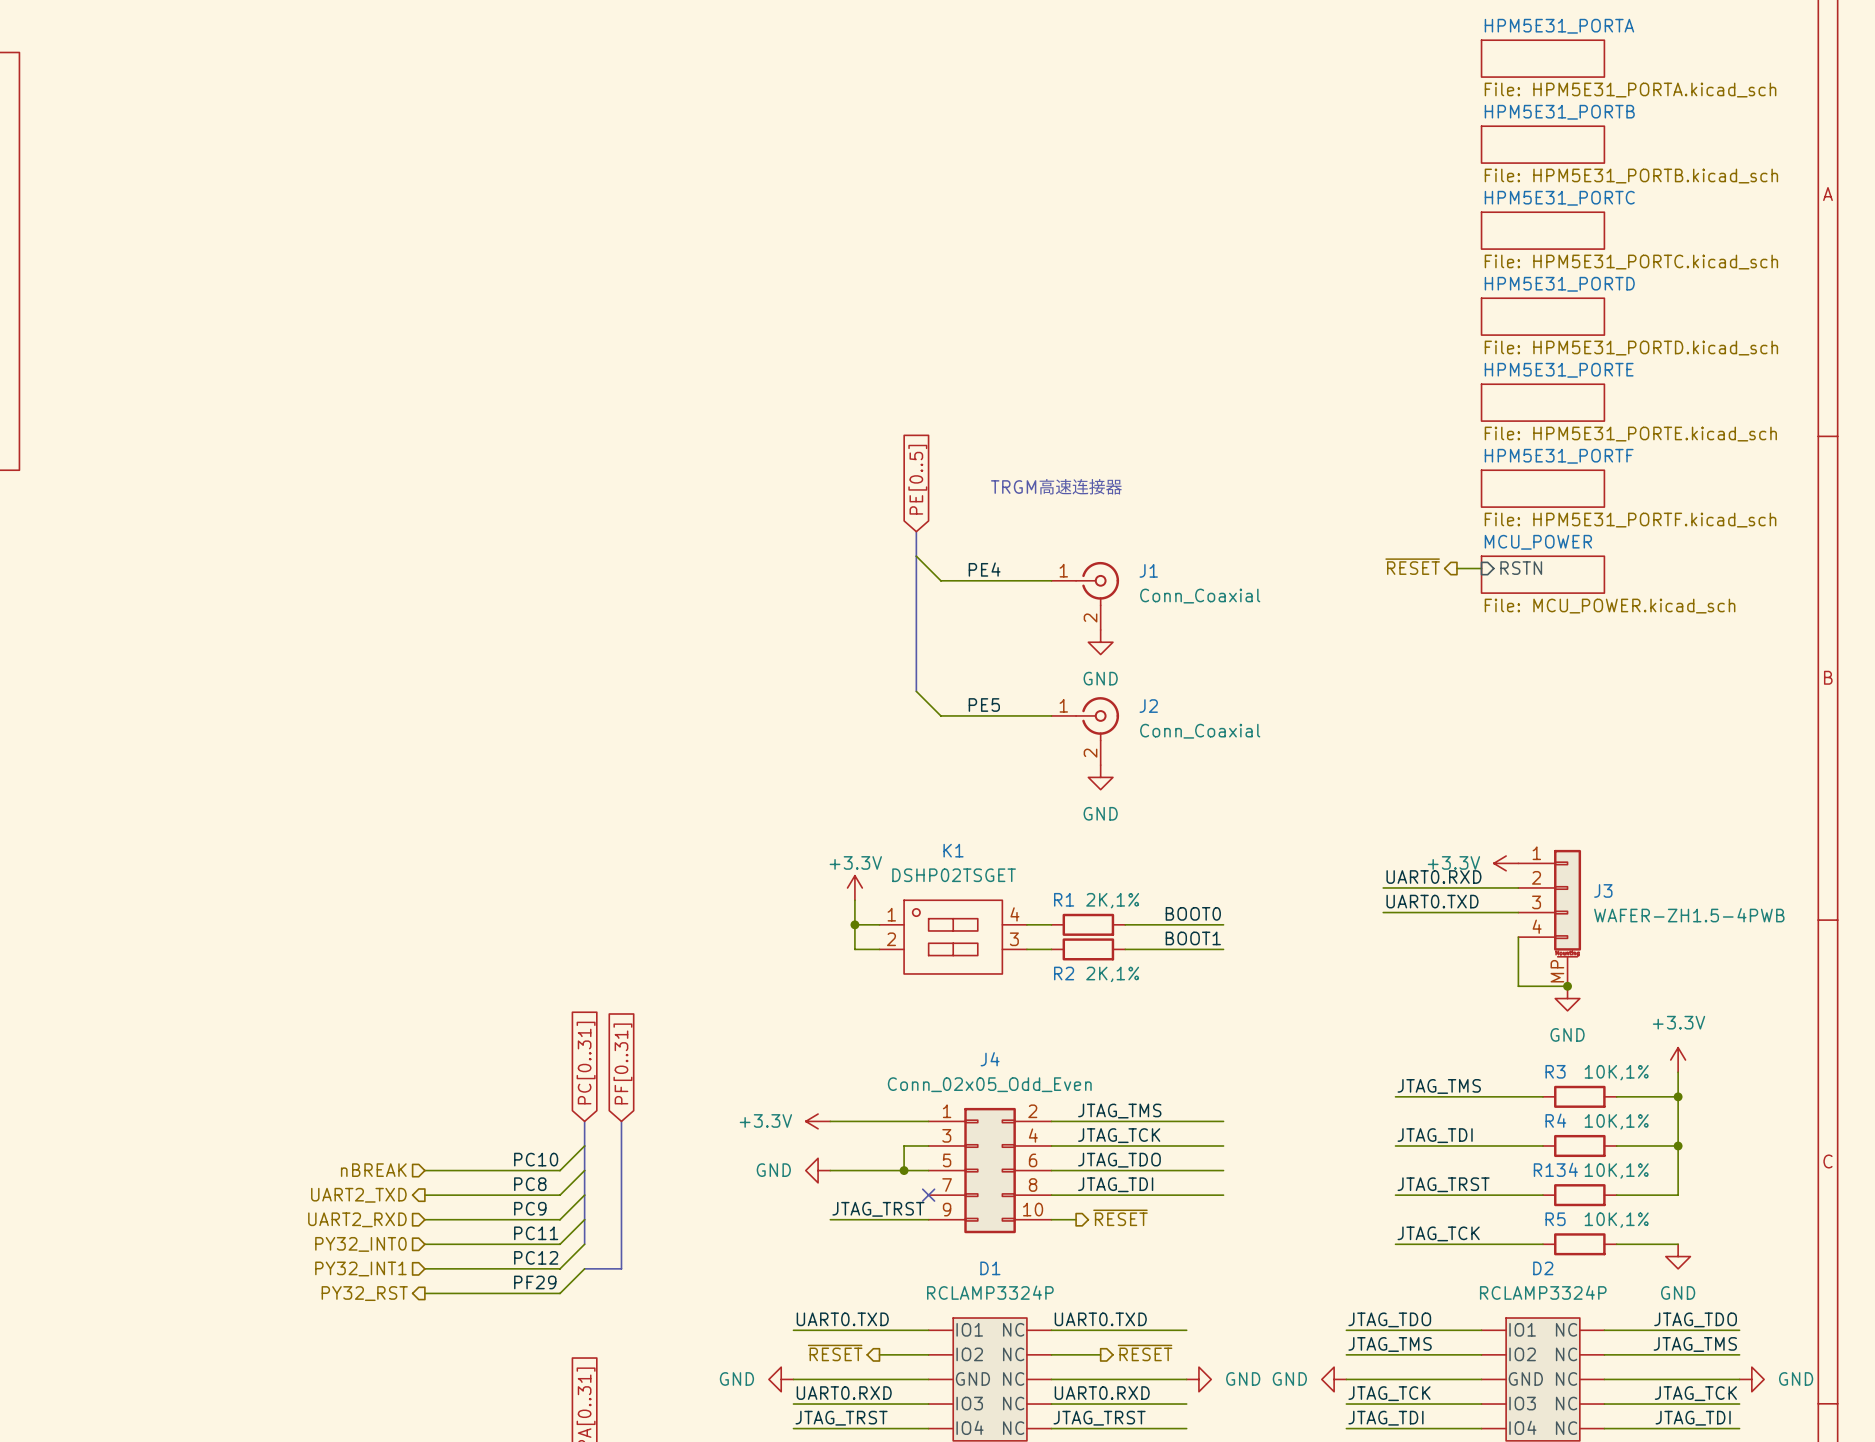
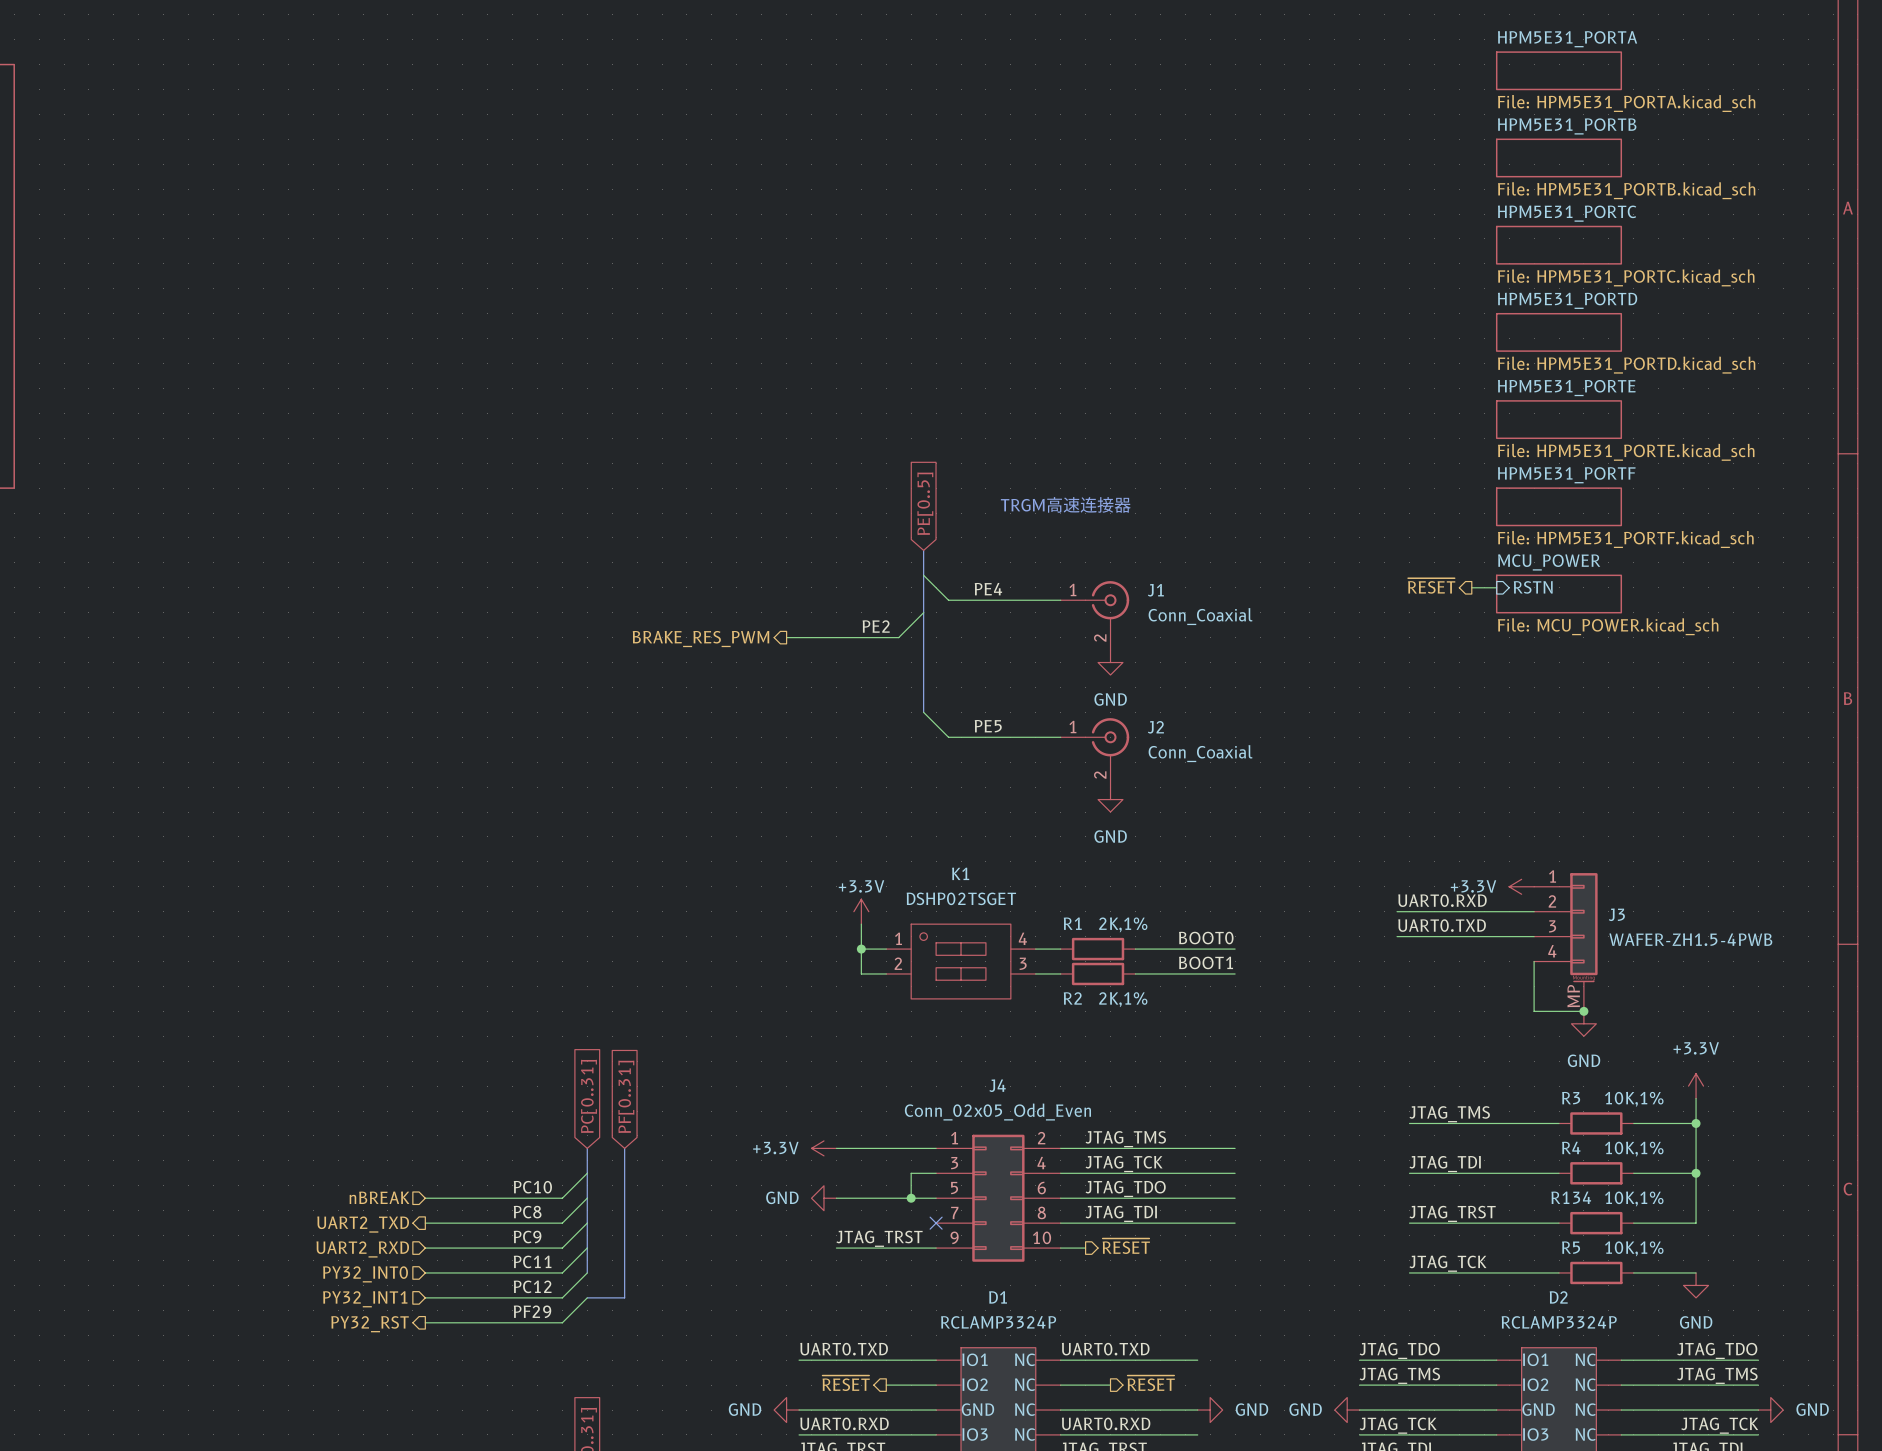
wire: none -> (923, 612) (898, 637) (786, 637)
label: none -> PE2 (876, 626)
hierarchical label: none -> BRAKE_RES_PWM (700, 639)

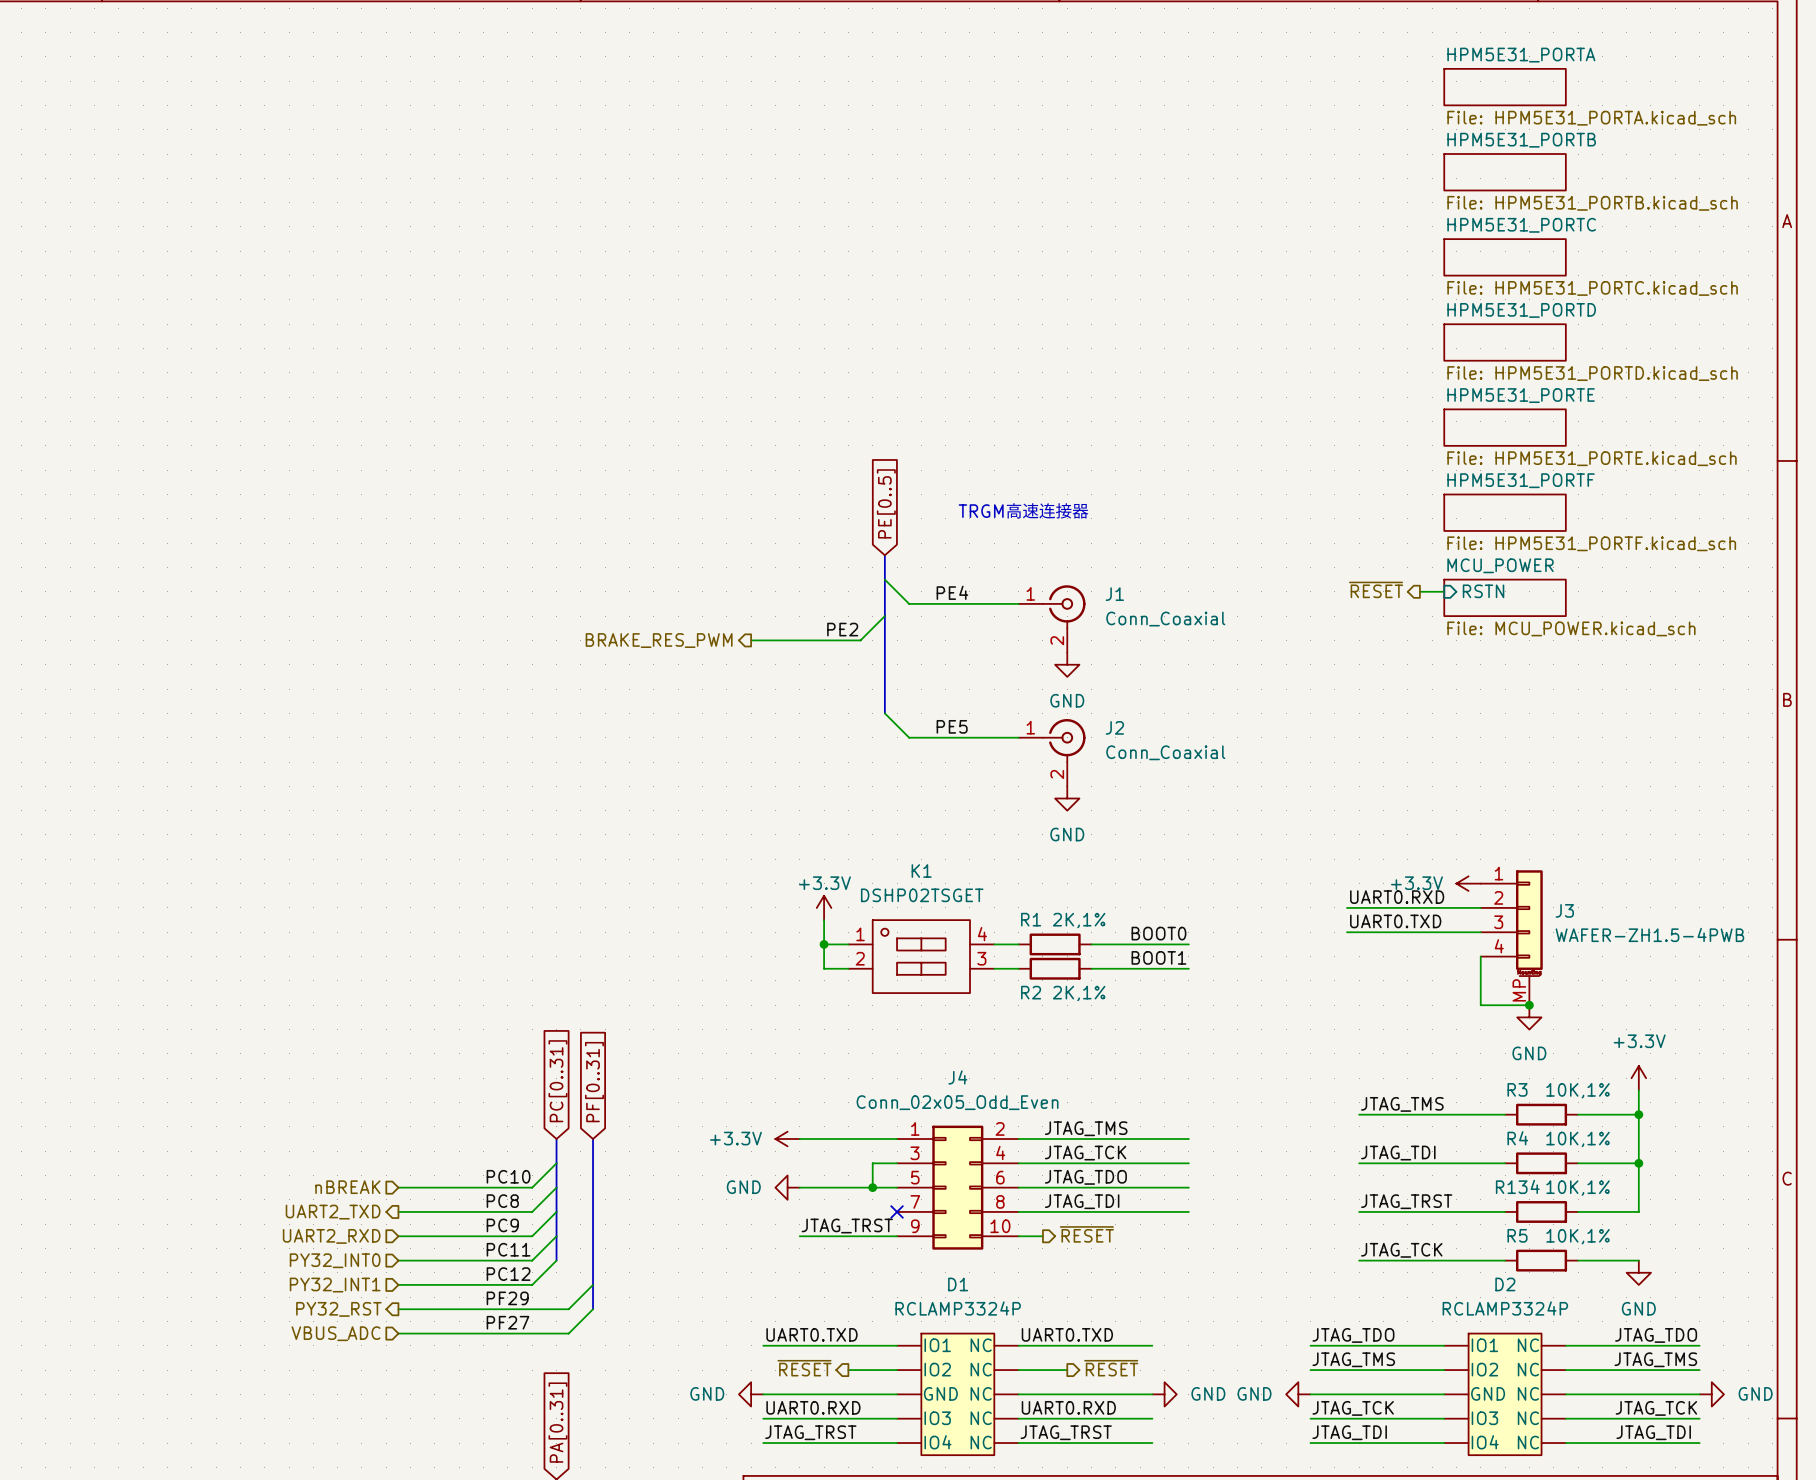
wire: (587, 1297) (562, 1322) -> (593, 1284) (568, 1309) (532, 1309)
bus: (587, 1297) (624, 1297) -> (593, 1309) (593, 1284)
wire: none -> (593, 1309) (568, 1333) (398, 1333)
label: none -> PF27 (507, 1322)
hierarchical label: none -> VBUS_ADC (336, 1333)

